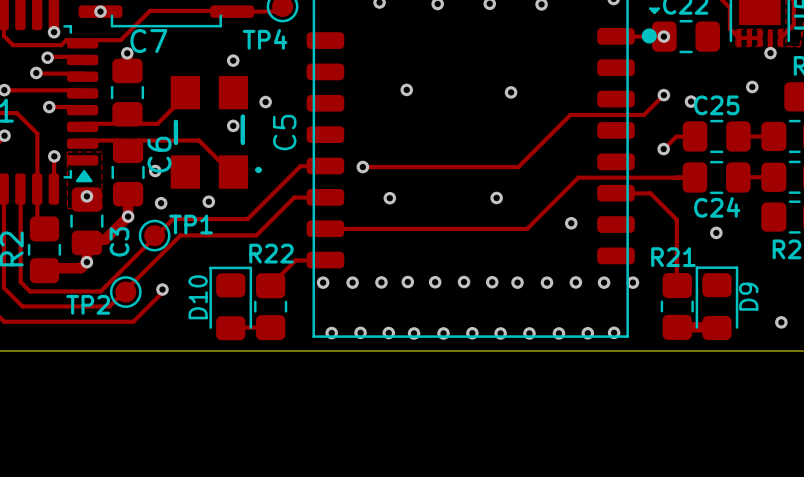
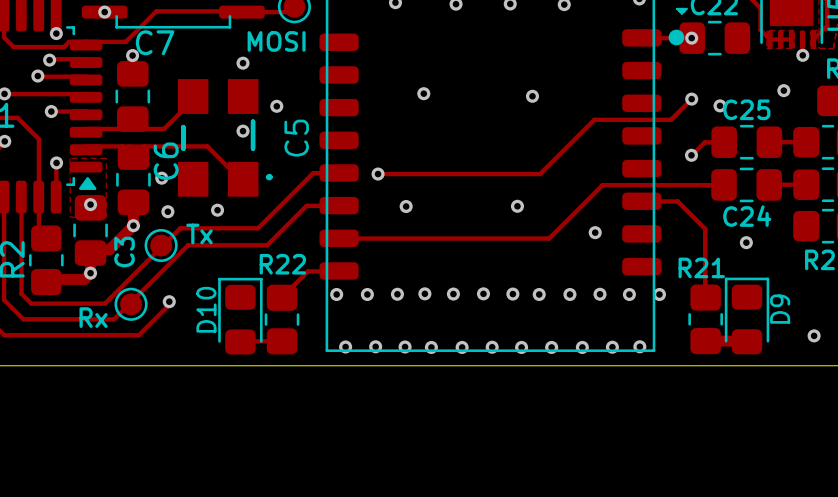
TP4 name: TP4 (265, 39) -> MOSI (276, 41)
TP1 name: TP1 (191, 224) -> Tx (199, 233)
TP2 name: TP2 (88, 304) -> Rx (93, 317)

